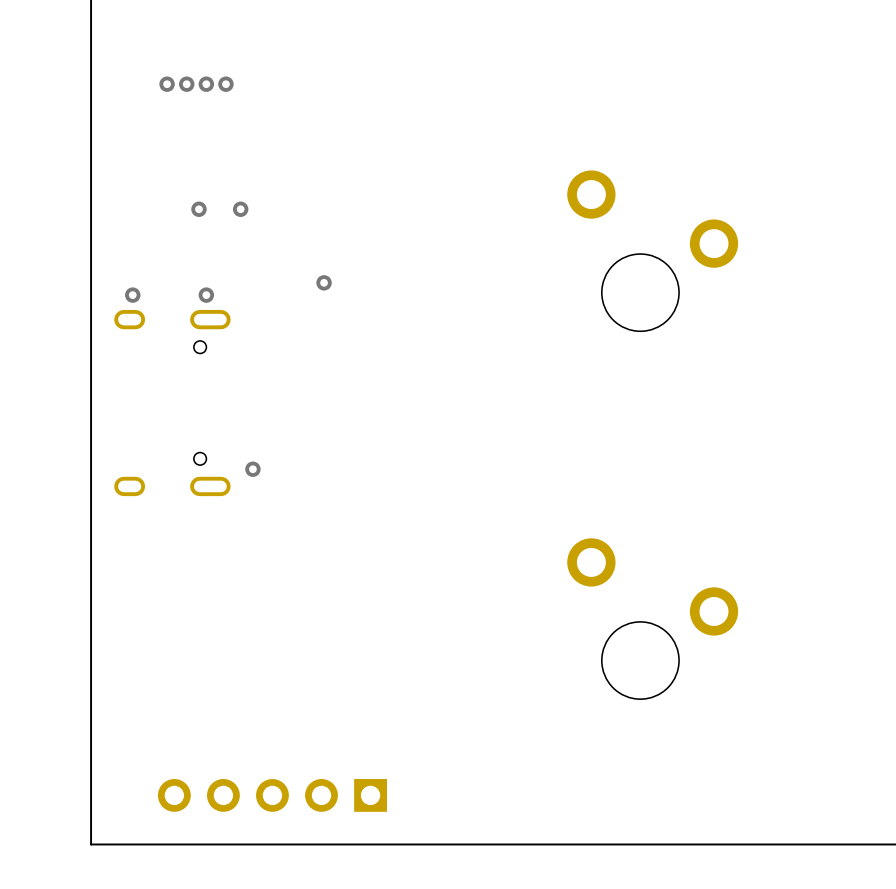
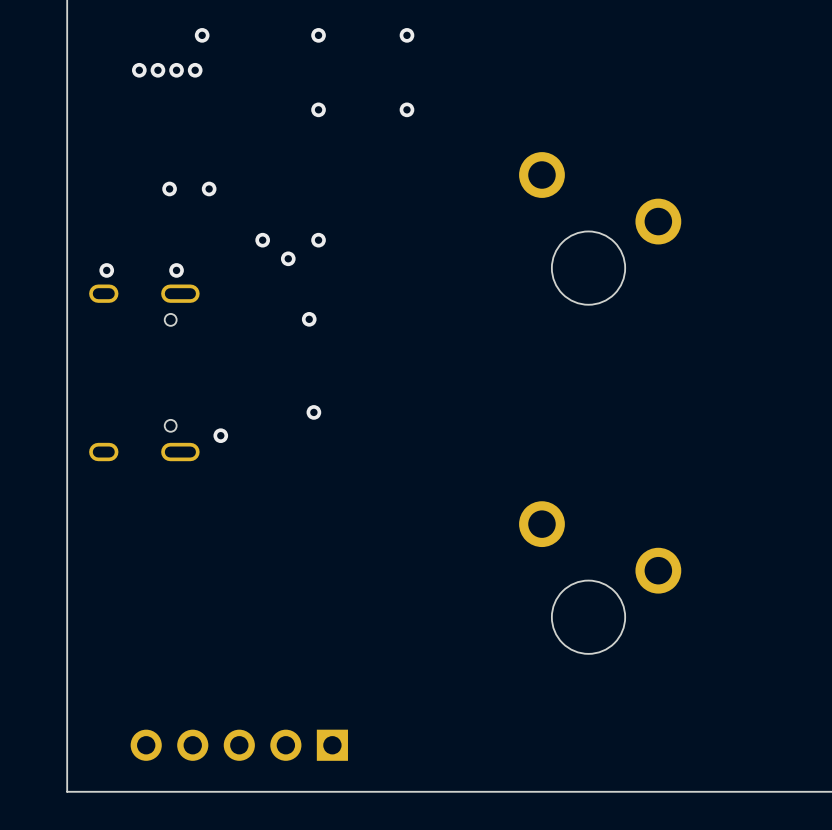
via: none -> (202, 35)
via: none -> (318, 35)
via: none -> (406, 35)
via: none -> (318, 109)
via: none -> (406, 109)
via: none -> (262, 240)
via: none -> (318, 240)
via: none -> (309, 319)
via: none -> (313, 412)

